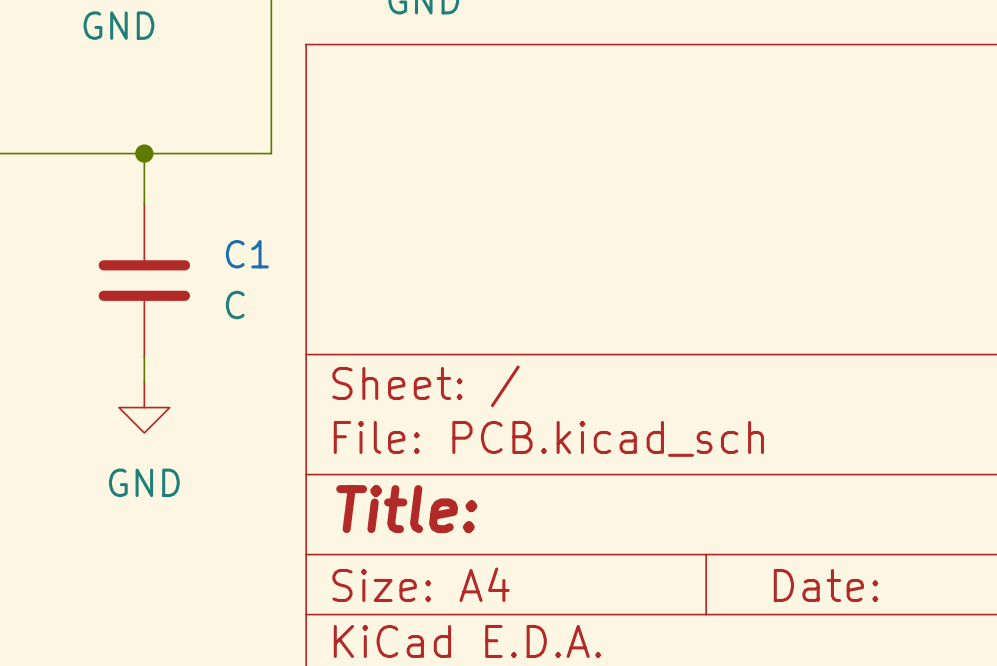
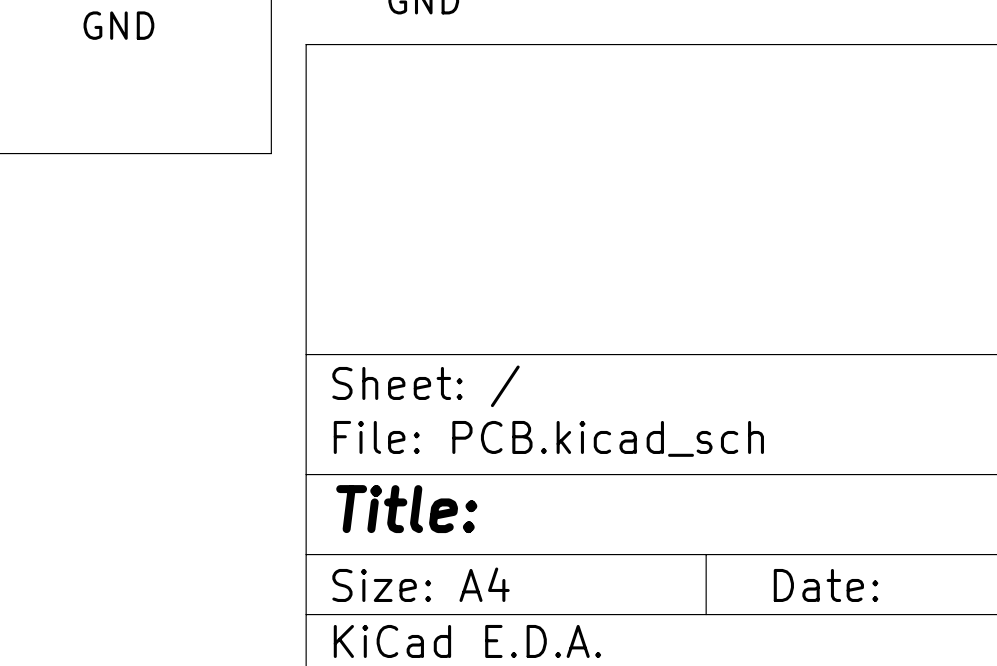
wire: (144, 153) (144, 204) -> none
junction: (144, 153) -> none
C1: C (144, 280) -> none
wire: (144, 356) (144, 382) -> none
power symbol: GND (144, 407) -> none

